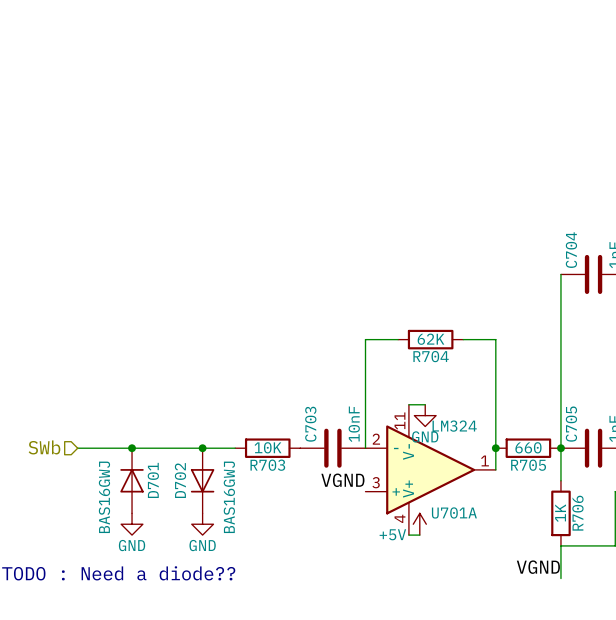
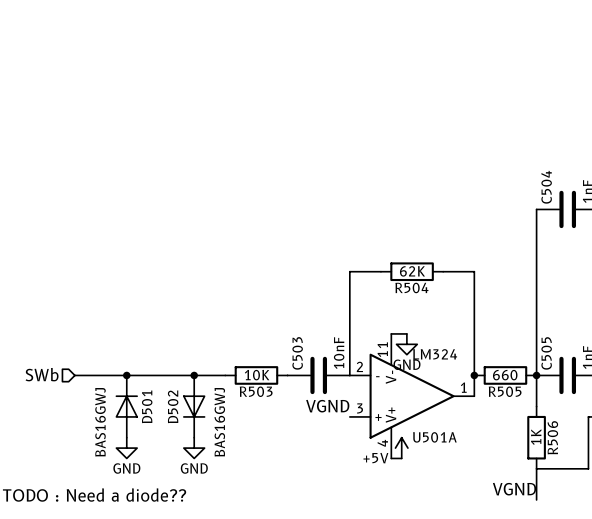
C704 name: C704 (571, 250) -> C504 (546, 187)
R704 name: R704 (431, 356) -> R504 (411, 287)
C703 name: C703 (310, 424) -> C503 (297, 353)
C705 name: C705 (571, 424) -> C505 (546, 353)
R703 name: R703 (267, 465) -> R503 (256, 391)
R705 name: R705 (528, 465) -> R505 (505, 391)
D701 name: D701 (153, 480) -> D501 (147, 406)
D702 name: D702 (180, 480) -> D502 (173, 406)
U701A name: U701A (454, 512) -> U501A (434, 437)
R706 name: R706 (577, 513) -> R506 (552, 437)

